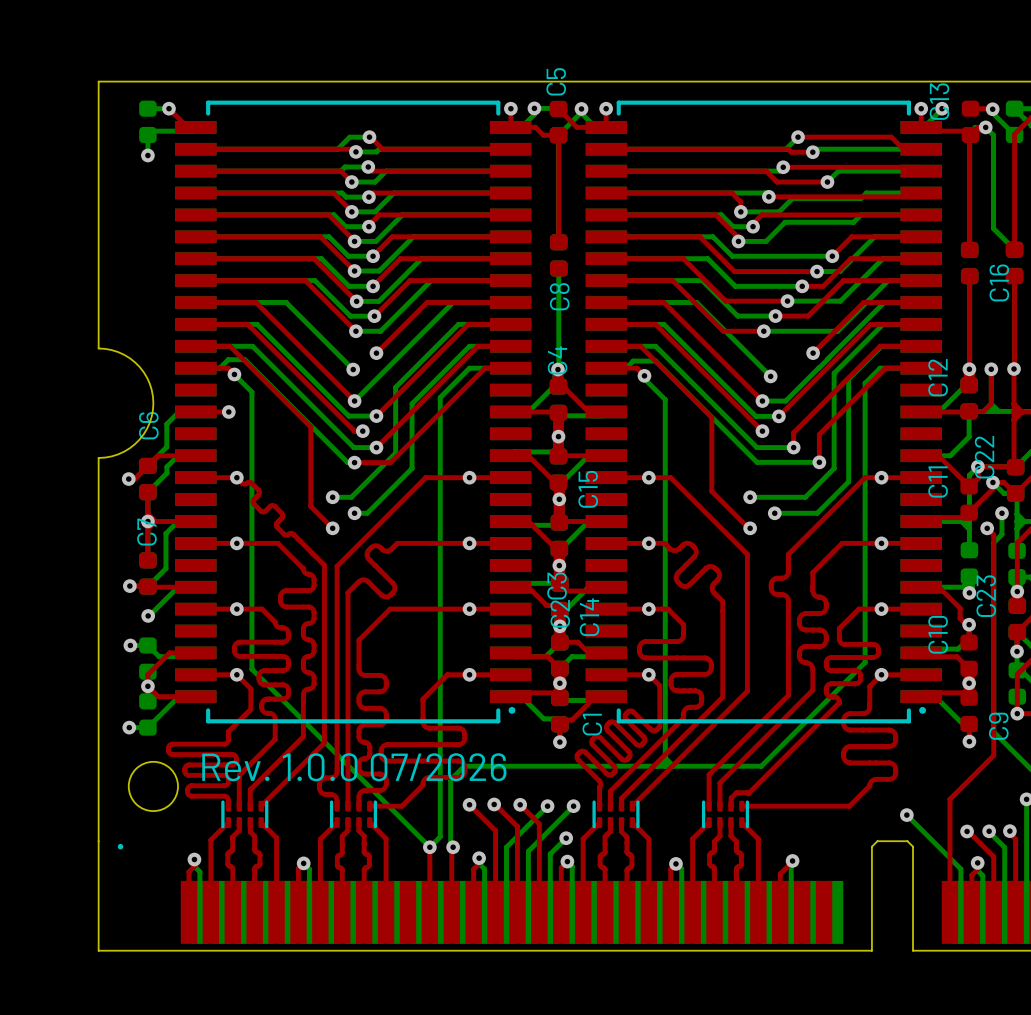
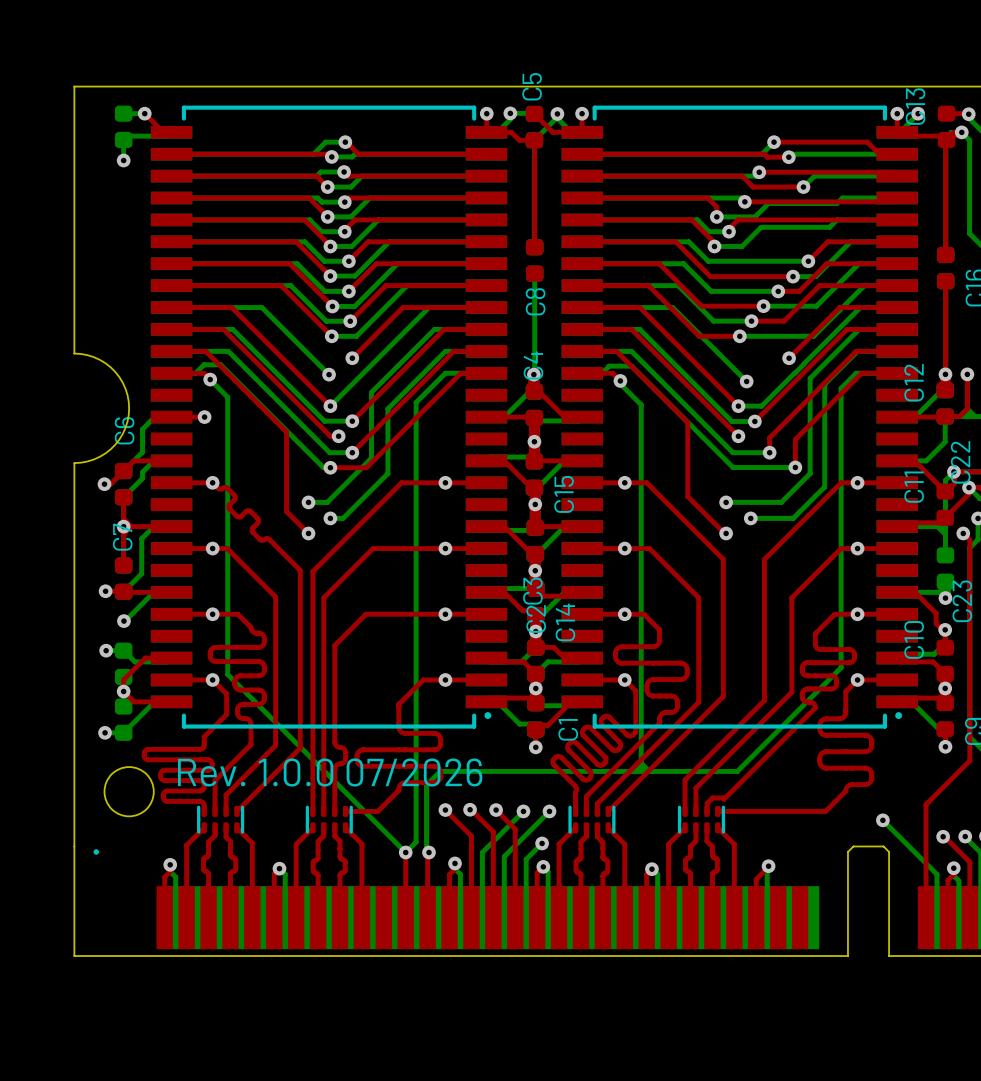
top track: (251, 543) (277, 543) (304, 572) (311, 574) (313, 578) (313, 586) (311, 590) (285, 590) (280, 596) (280, 602) (284, 606) (309, 607) (314, 611) (313, 620) (305, 624) (303, 628) (304, 637) (312, 641) (314, 645) (312, 654) (303, 659) (303, 668) (313, 675) (314, 683) (312, 687) (305, 689) (303, 693) (303, 736) (299, 740) -> (227, 548) (275, 597) (275, 745)
top track: (664, 543) (672, 550) (677, 550) (687, 543) (695, 549) (694, 556) (676, 575) (676, 580) (682, 585) (689, 585) (707, 567) (715, 568) (719, 576) (713, 584) (712, 589) (722, 601) -> (640, 548) (649, 548) (698, 597) (698, 606)
top track: (865, 543) (842, 543) (812, 572) (812, 592) (819, 597) -> (841, 548) (791, 597) (791, 692) (788, 695)
top track: (391, 549) (385, 551) (374, 545) (368, 550) (367, 554) (368, 559) (393, 584) (394, 590) (390, 594) (383, 596) (366, 580) (358, 581) -> (367, 554) (334, 586)
top track: (788, 571) (784, 577) (773, 579) (771, 584) (773, 592) (785, 595) (788, 601) -> (764, 576) (764, 606)
top track: (819, 597) (825, 601) (824, 611) (820, 613) (803, 614) (799, 617) (799, 624) (803, 629) (823, 631) (826, 635) (826, 641) (821, 646) (801, 648) (799, 658) (805, 662) -> none
top track: (806, 662) (812, 667) (812, 690) -> none
top track: (358, 668) (362, 674) (381, 675) (386, 682) (383, 690) (363, 692) (358, 698) -> (334, 674) (334, 703)
top track: (358, 701) (363, 707) (382, 708) (386, 714) (383, 723) (363, 725) (358, 731) -> (334, 706) (334, 736)
top track: (358, 767) (362, 773) (381, 774) (386, 780) (383, 789) (363, 790) (358, 796) -> (334, 772) (334, 802)
top track: (337, 771) (334, 776) (323, 778) (319, 784) (321, 792) (333, 795) (337, 800) -> (312, 776) (312, 806)

